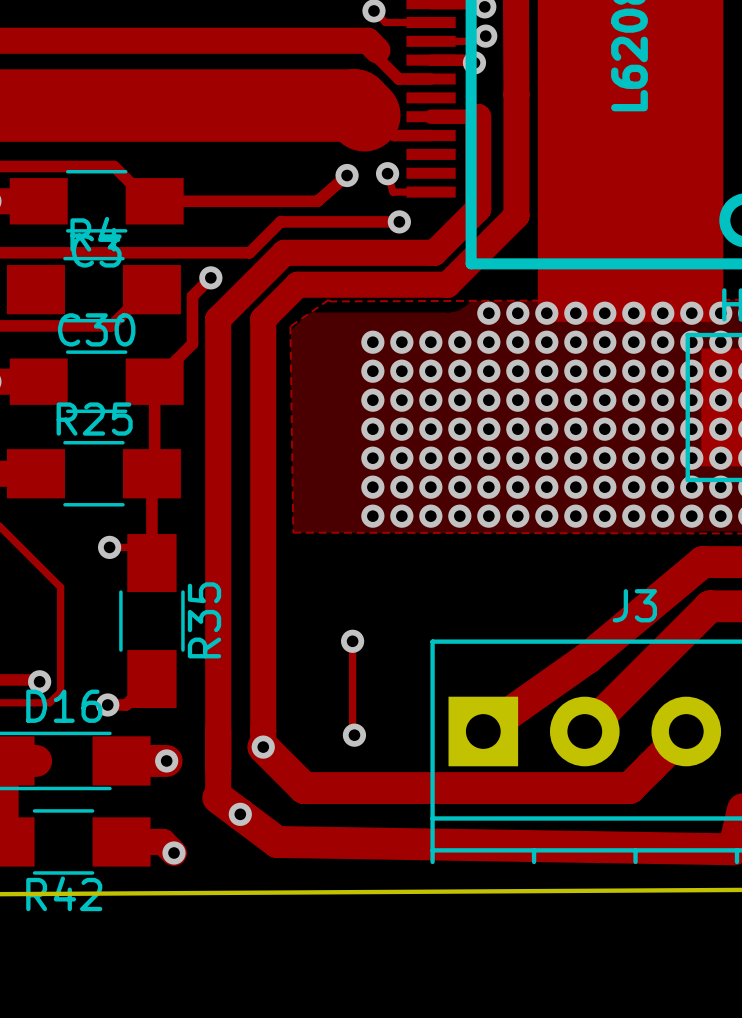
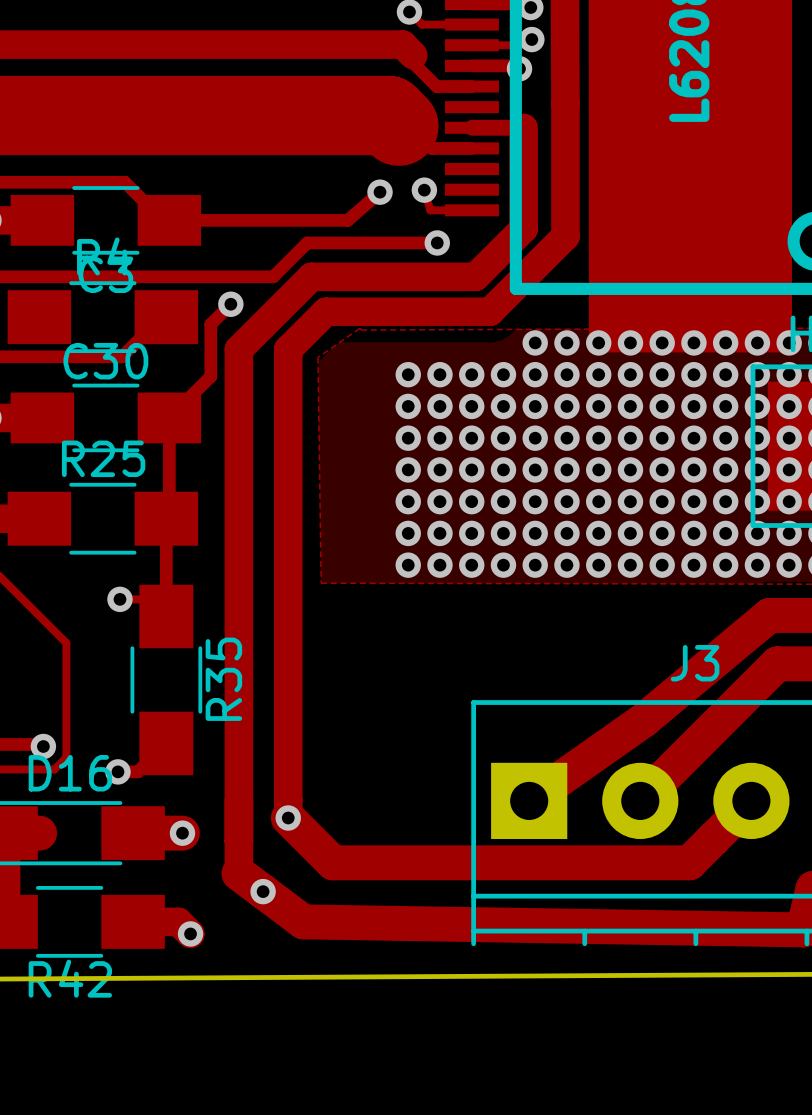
track: (352, 641) (352, 733) (354, 735) -> none
via: (352, 641) -> none
via: (354, 735) -> none

